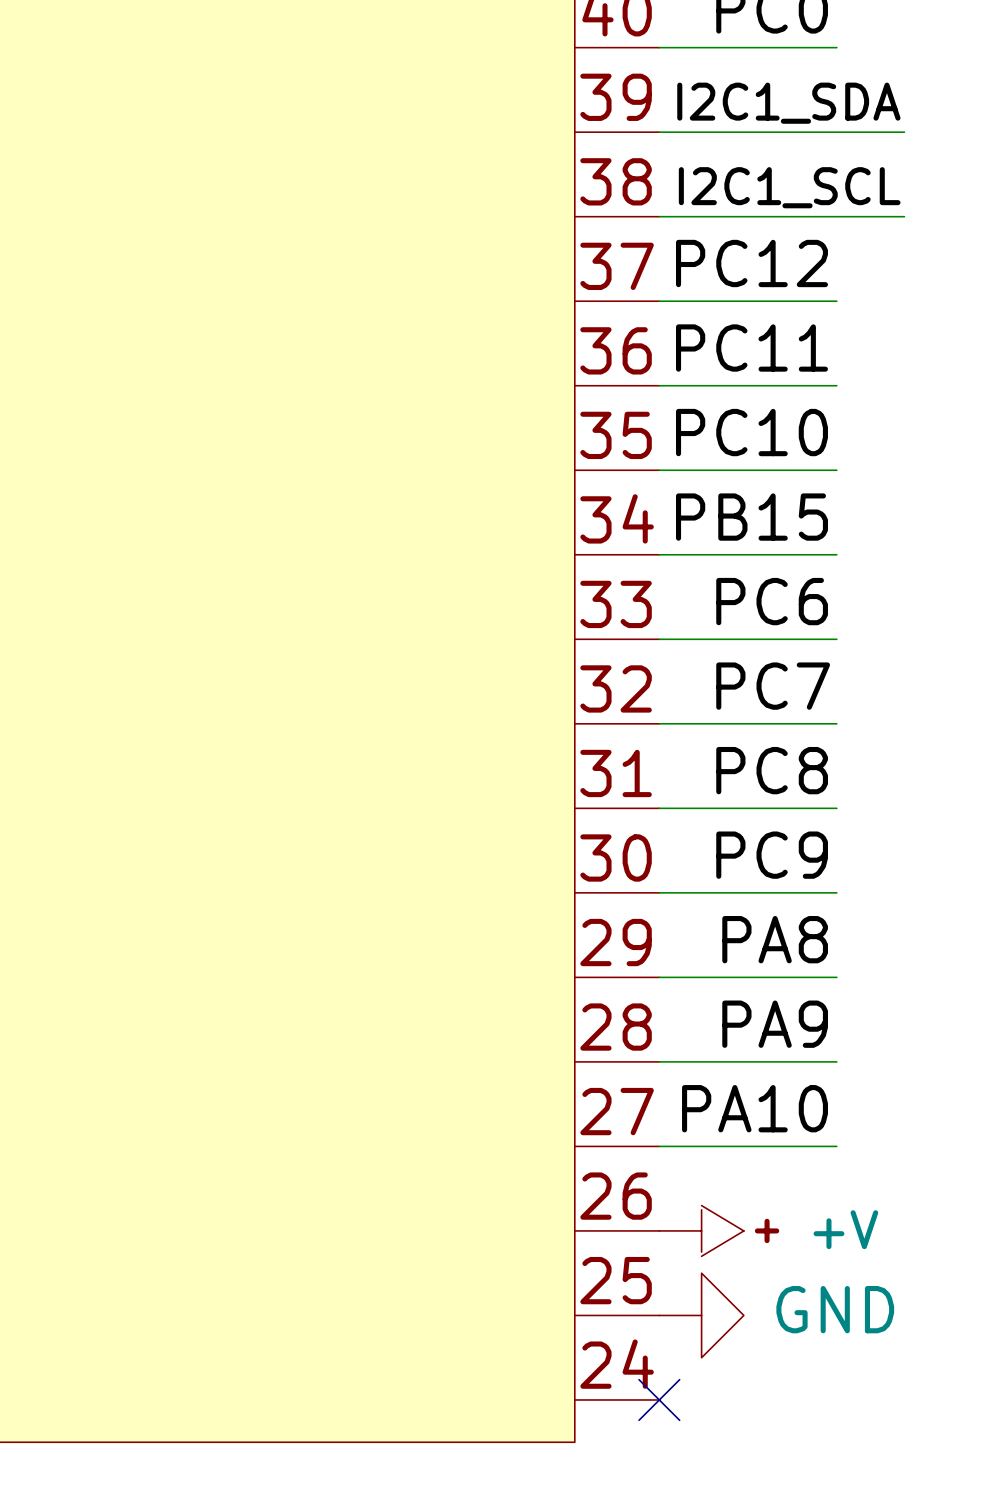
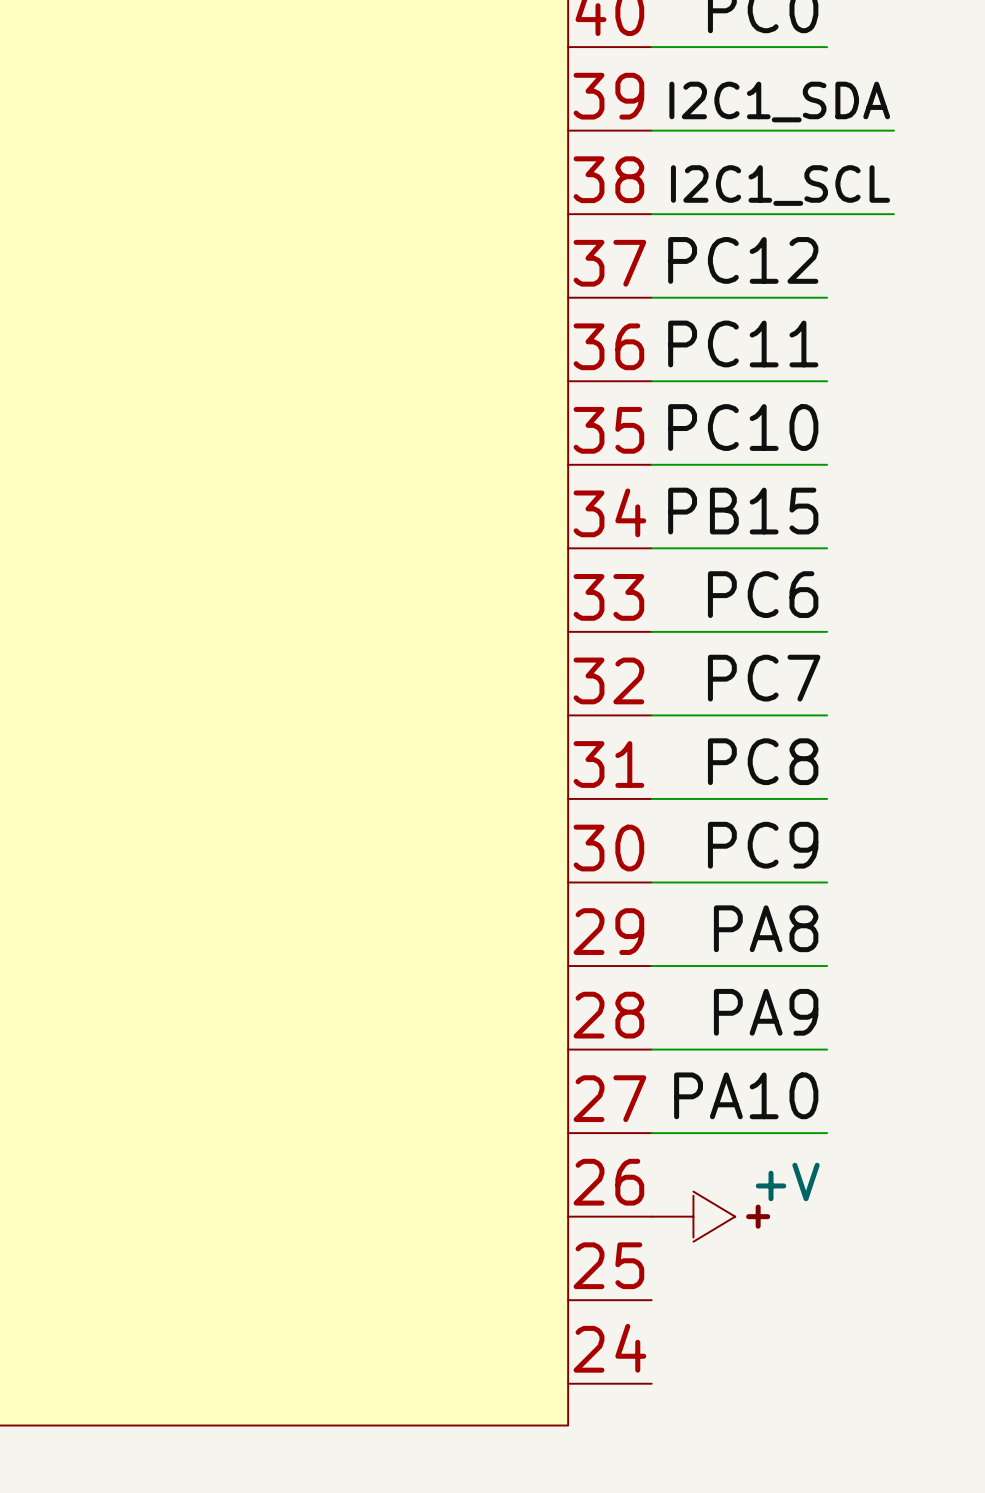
power symbol text position: +V (845, 1229) -> +V (787, 1181)
power symbol: GND (701, 1315) -> none
no-connect mark: (659, 1399) -> none

